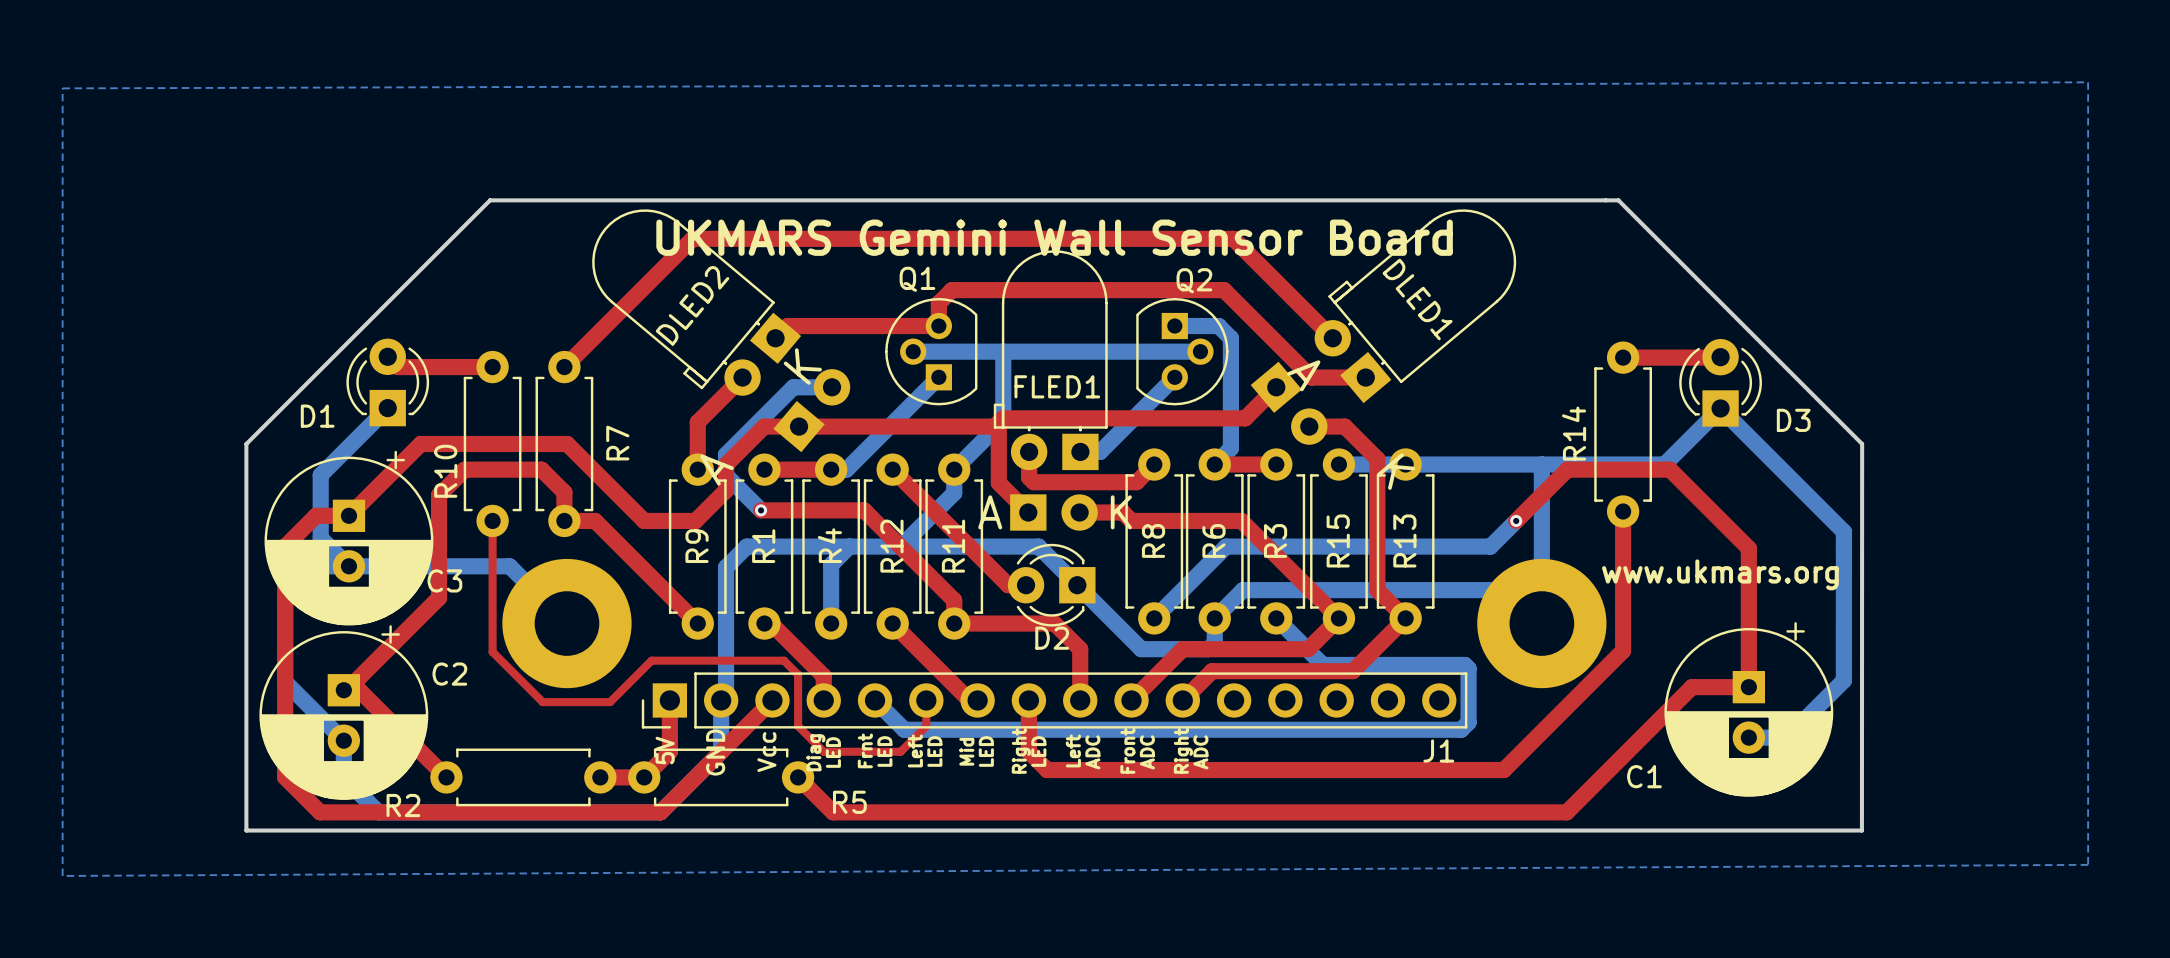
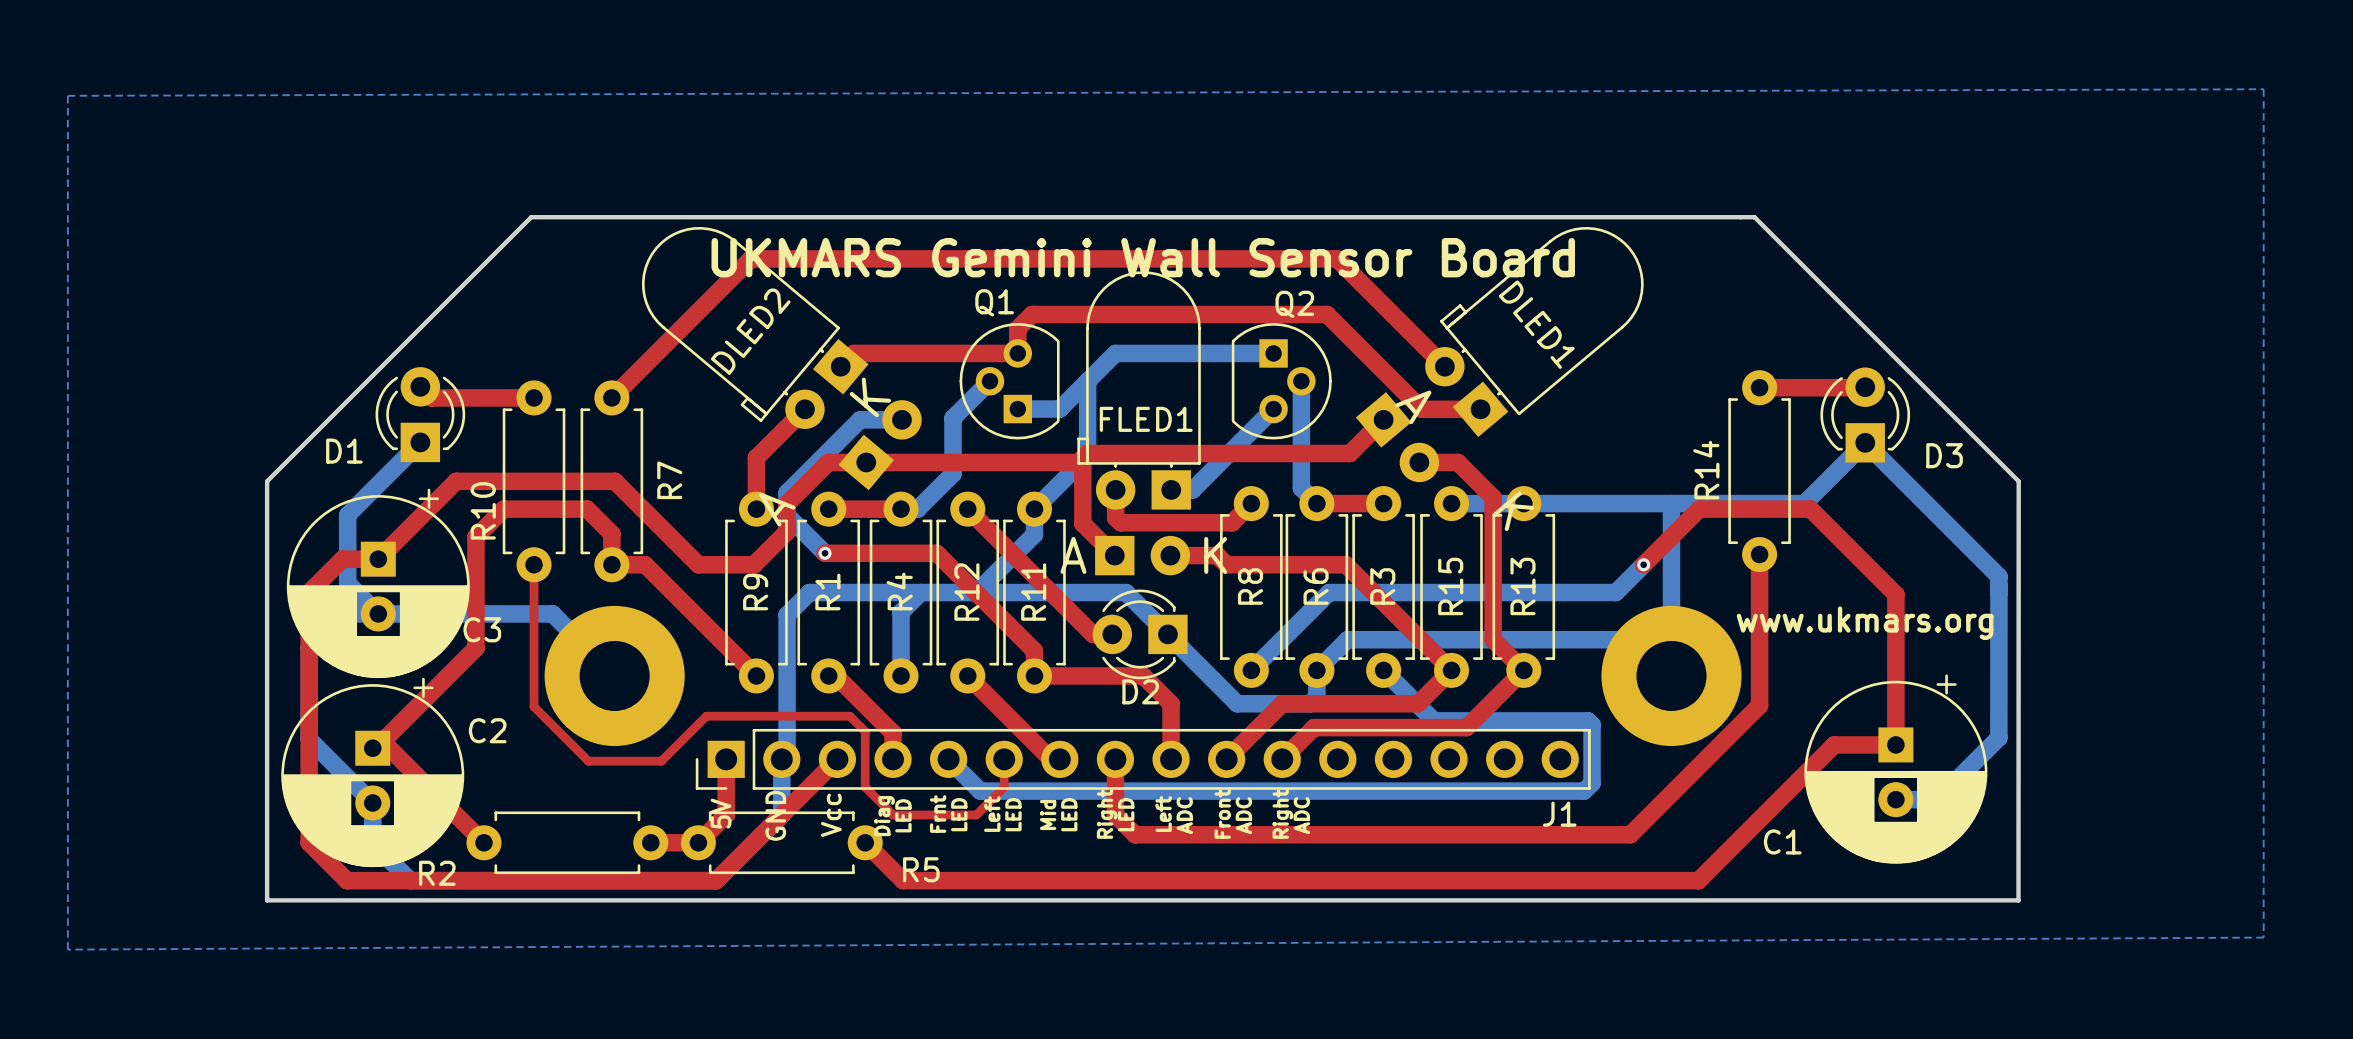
bottom track: (1174, 326) (1218, 326) (1230, 338) (1230, 448) (1214, 464) -> (1301, 381) (1301, 488) (1316, 503)
bottom track: none -> (1273, 353) (1115, 353) (1059, 409) (1017, 409)
bottom track: (913, 351) (1200, 351) -> none
bottom track: (938, 377) (879, 437) -> (989, 381) (952, 418) (952, 473)

